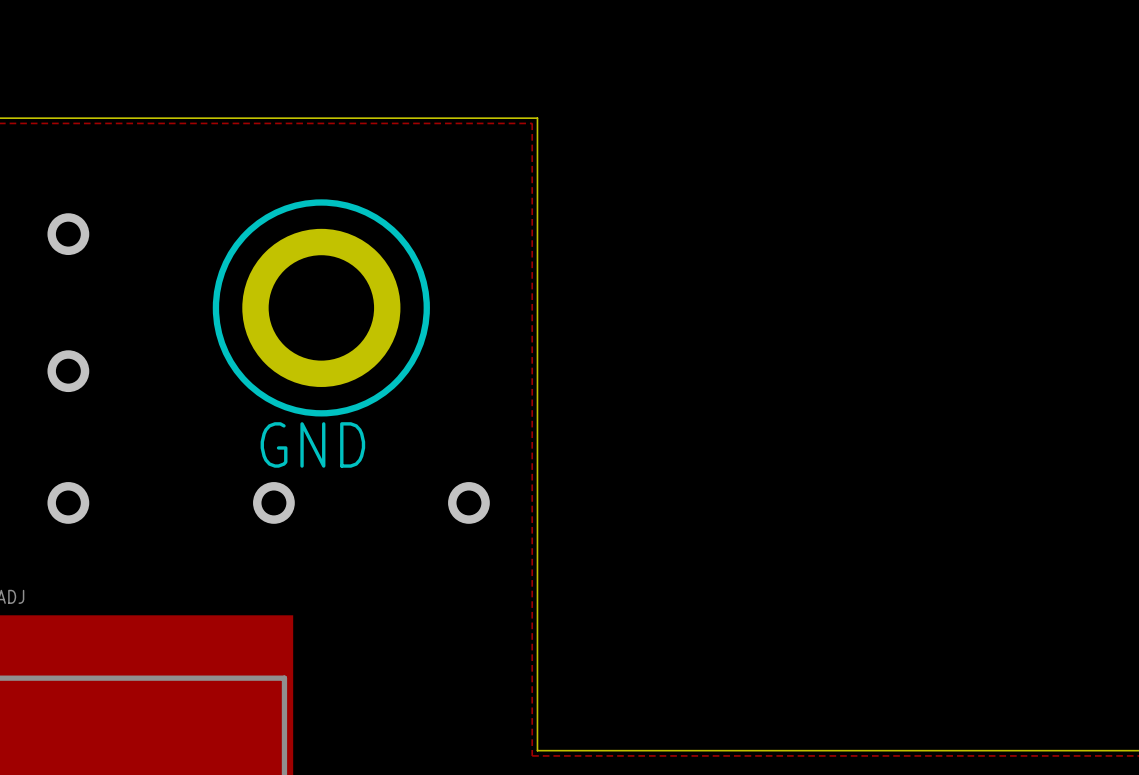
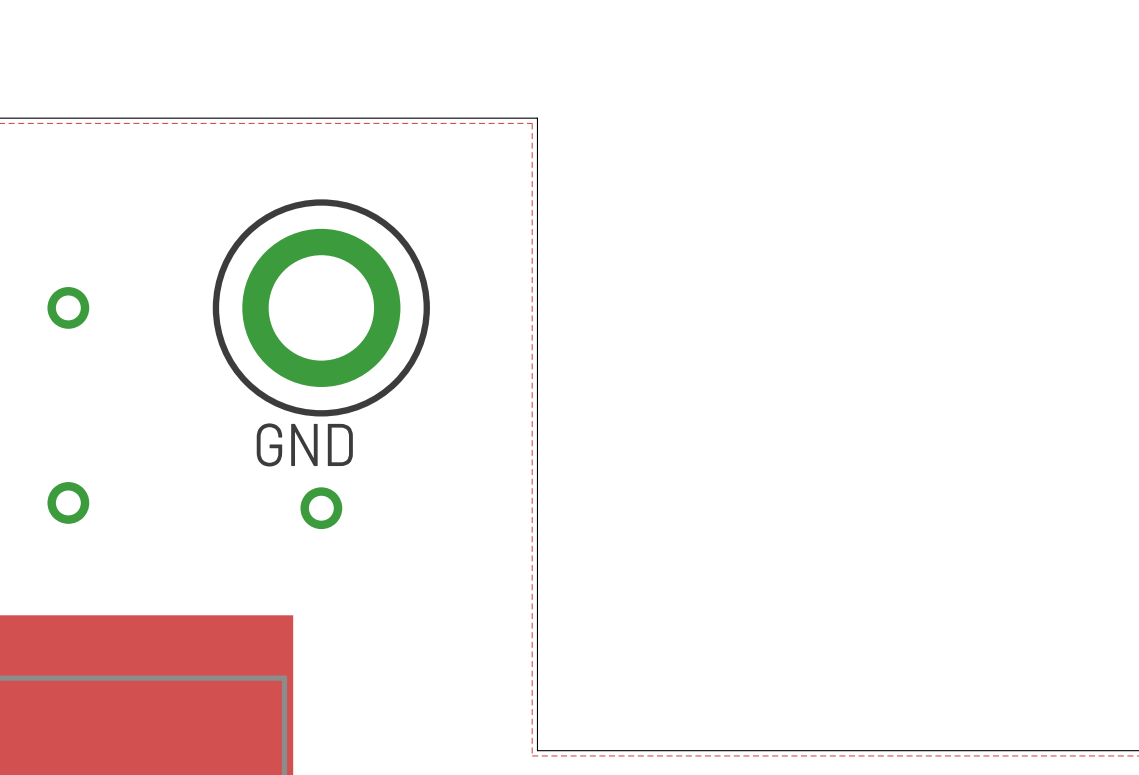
via: (68, 234) -> none
via: none -> (68, 307)
via: (68, 371) -> none
via position: (273, 502) -> (321, 508)
via: (468, 502) -> none

